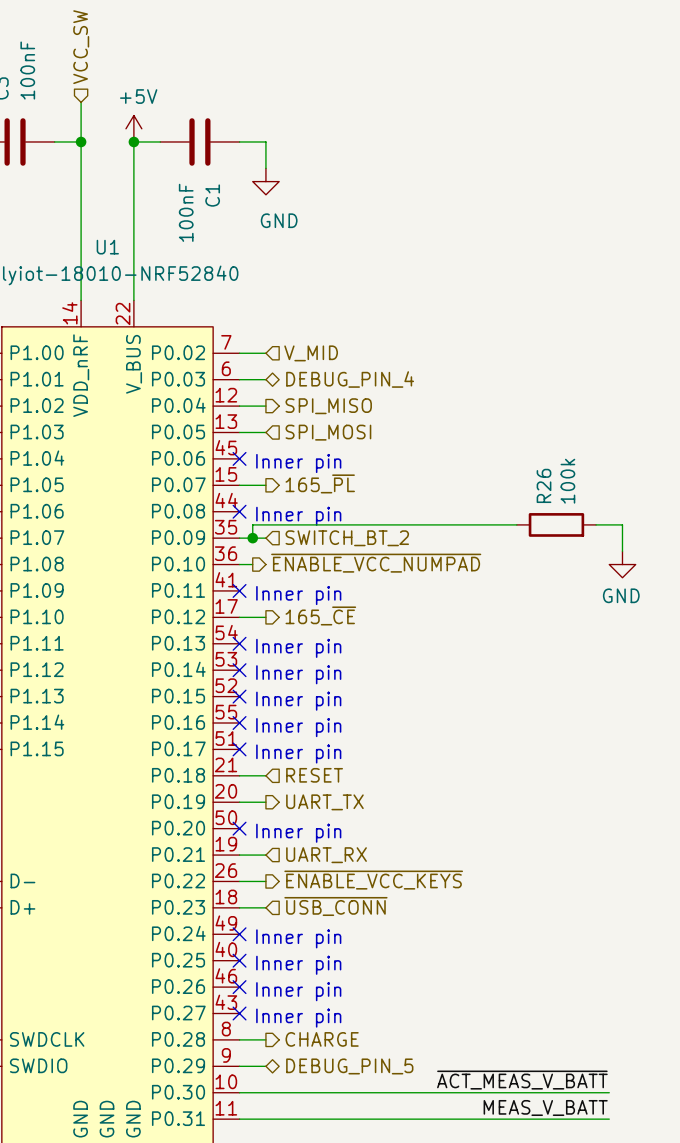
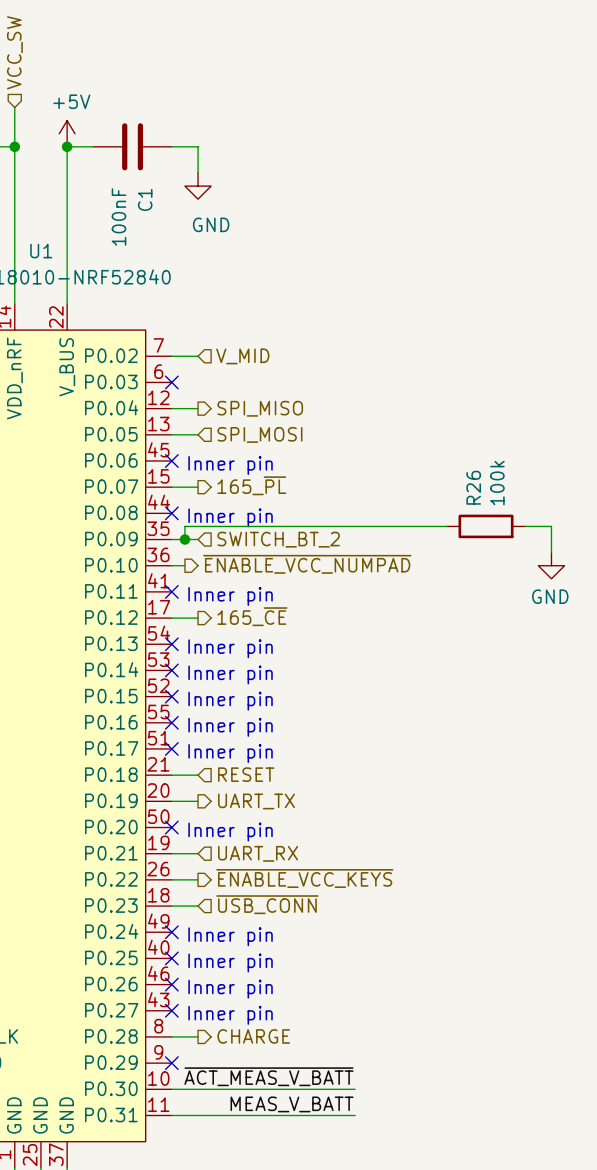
wire: (239, 379) (265, 379) -> none
no-connect mark: none -> (171, 382)
hierarchical label: DEBUG_PIN_4 (350, 379) -> none
wire: (239, 1066) (265, 1066) -> none
no-connect mark: none -> (171, 1063)
hierarchical label: DEBUG_PIN_5 (349, 1066) -> none
label position: ~{ACT_MEAS_V_BATT} (522, 1080) -> ~{ACT_MEAS_V_BATT} (268, 1076)
wire: (424, 1092) (609, 1092) -> none
label position: MEAS_V_BATT (545, 1107) -> MEAS_V_BATT (292, 1104)
wire: (424, 1119) (609, 1119) -> none

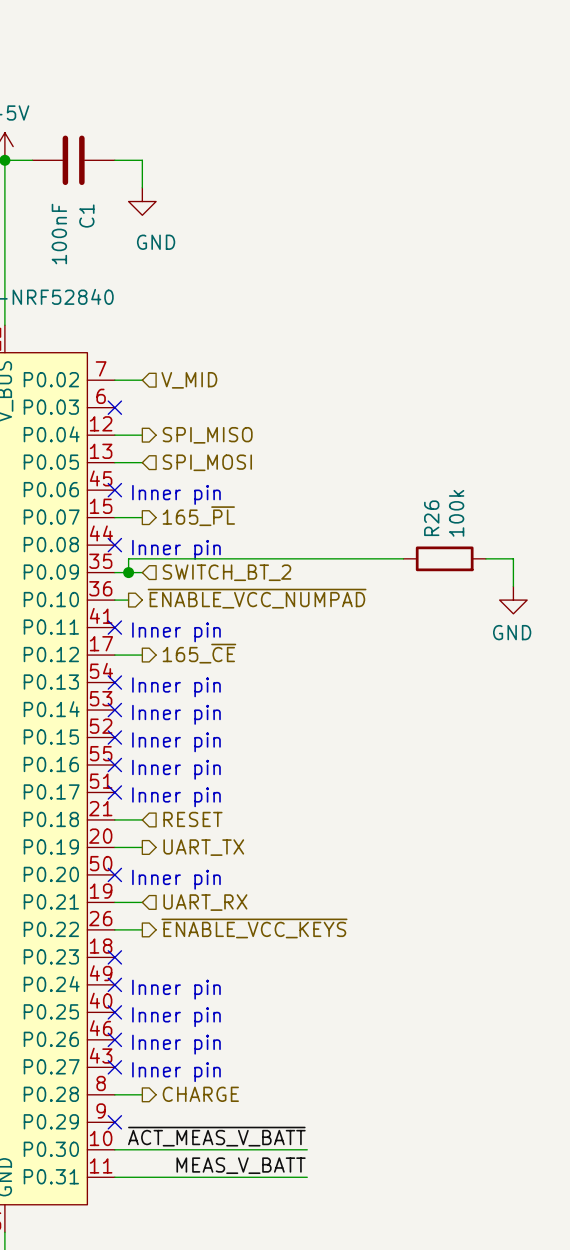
hierarchical label: ~{USB_CONN} (267, 904) -> none
wire: (171, 906) (198, 906) -> none
no-connect mark: none -> (114, 957)

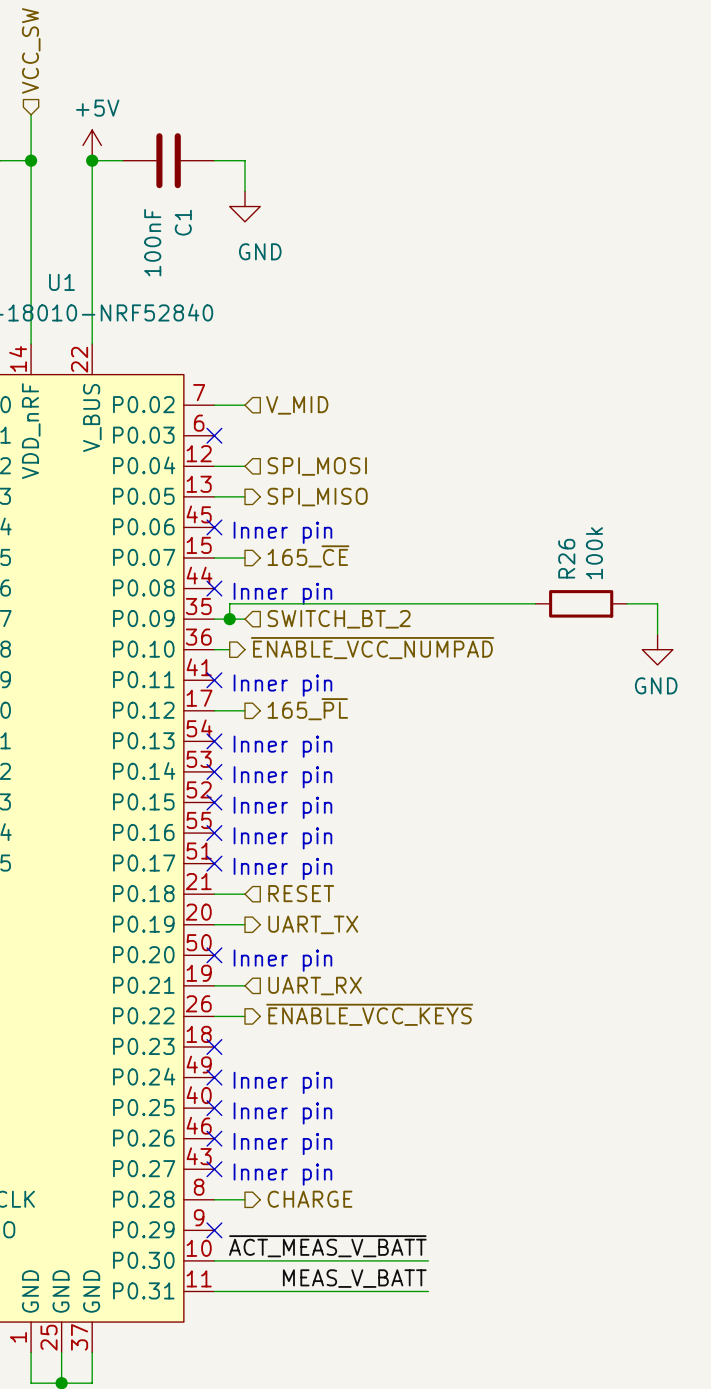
hierarchical label shape: output (207, 435) -> input (317, 466)
hierarchical label: SPI_MISO (207, 435) -> SPI_MOSI (317, 466)
hierarchical label shape: input (207, 462) -> output (317, 497)
hierarchical label: SPI_MOSI (207, 462) -> SPI_MISO (317, 497)
hierarchical label: 165_~{PL} (198, 516) -> 165_~{CE} (308, 556)
hierarchical label: 165_~{CE} (199, 653) -> 165_~{PL} (307, 709)

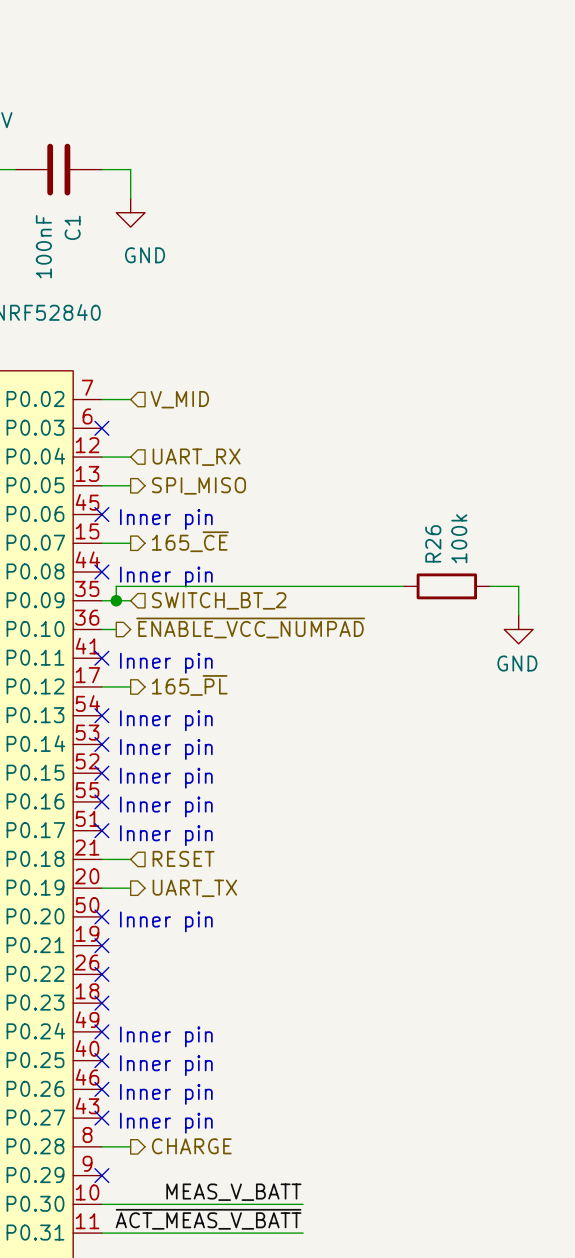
hierarchical label: SPI_MOSI (317, 466) -> UART_RX (196, 457)
wire: (214, 985) (244, 985) -> none
no-connect mark: none -> (101, 945)
hierarchical label: UART_RX (315, 986) -> none
hierarchical label: ~{ENABLE_VCC_KEYS} (369, 1014) -> none
wire: (214, 1016) (244, 1016) -> none
no-connect mark: none -> (101, 974)
label: ~{ACT_MEAS_V_BATT} (327, 1246) -> MEAS_V_BATT (233, 1192)
label: MEAS_V_BATT (354, 1278) -> ~{ACT_MEAS_V_BATT} (208, 1219)

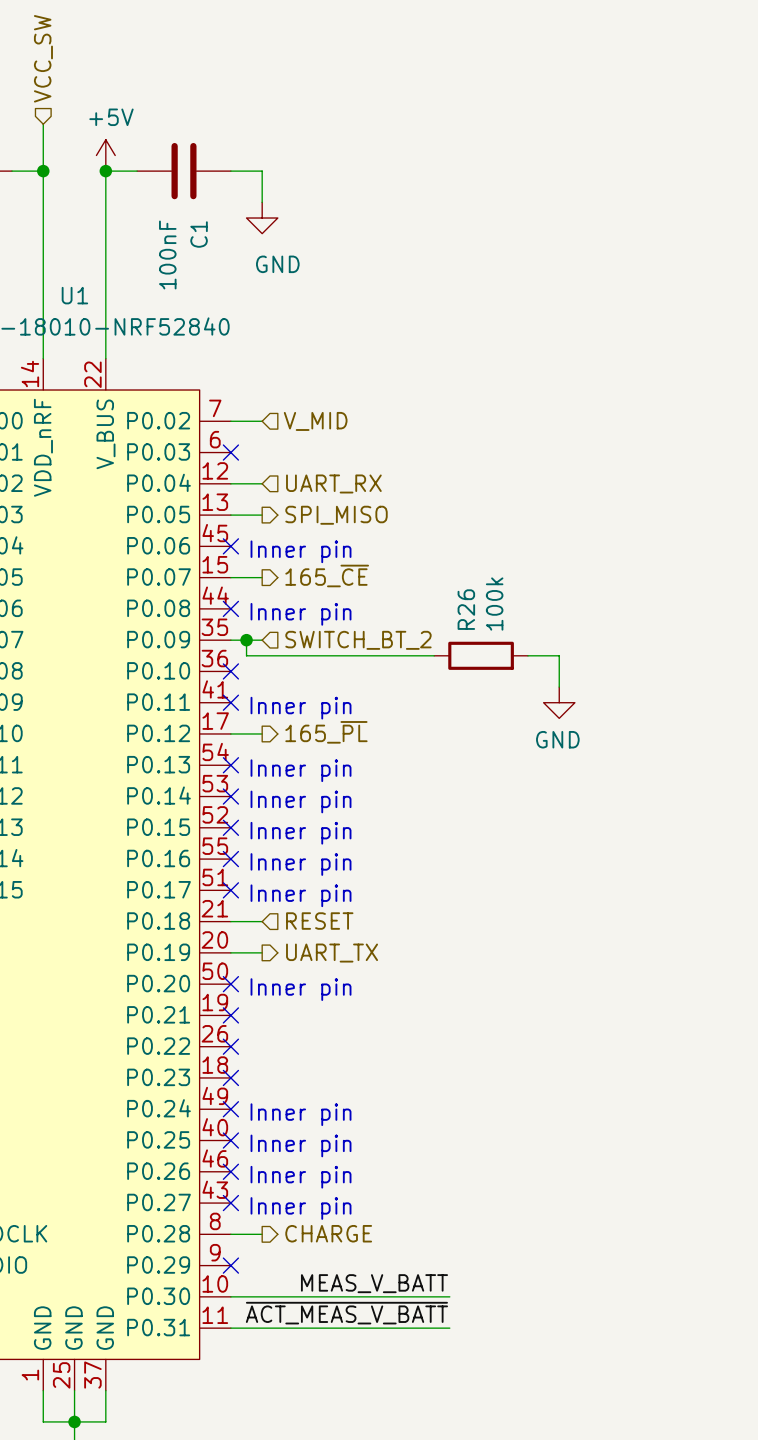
wire: (403, 586) (116, 586) (116, 600) -> (434, 655) (246, 655) (246, 640)
R26 position: (446, 586) -> (481, 655)
wire: (489, 586) (518, 586) (518, 615) -> (527, 655) (559, 655) (559, 687)
hierarchical label: ~{ENABLE_VCC_NUMPAD} (250, 627) -> none
wire: (101, 629) (116, 629) -> none
no-connect mark: none -> (230, 671)
power symbol position: GND (518, 629) -> GND (559, 702)

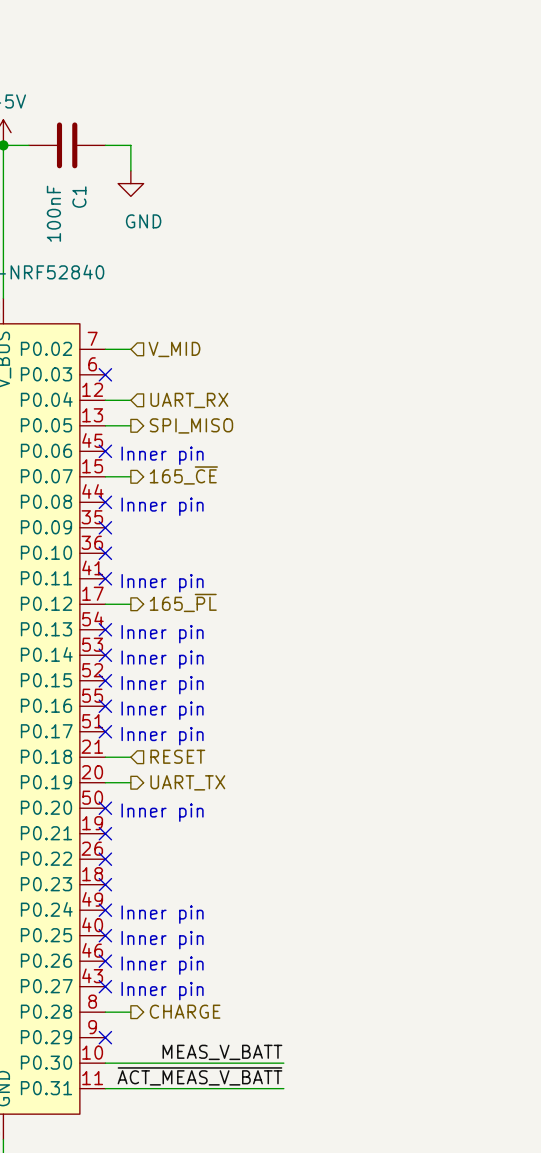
wire: (230, 640) (262, 640) -> none
no-connect mark: none -> (105, 527)
wire: (246, 640) (246, 655) (434, 655) -> none
junction: (246, 640) -> none
hierarchical label: SWITCH_BT_2 (358, 640) -> none
R26: 100k (481, 655) -> none
wire: (527, 655) (559, 655) (559, 687) -> none
power symbol: GND (559, 702) -> none

